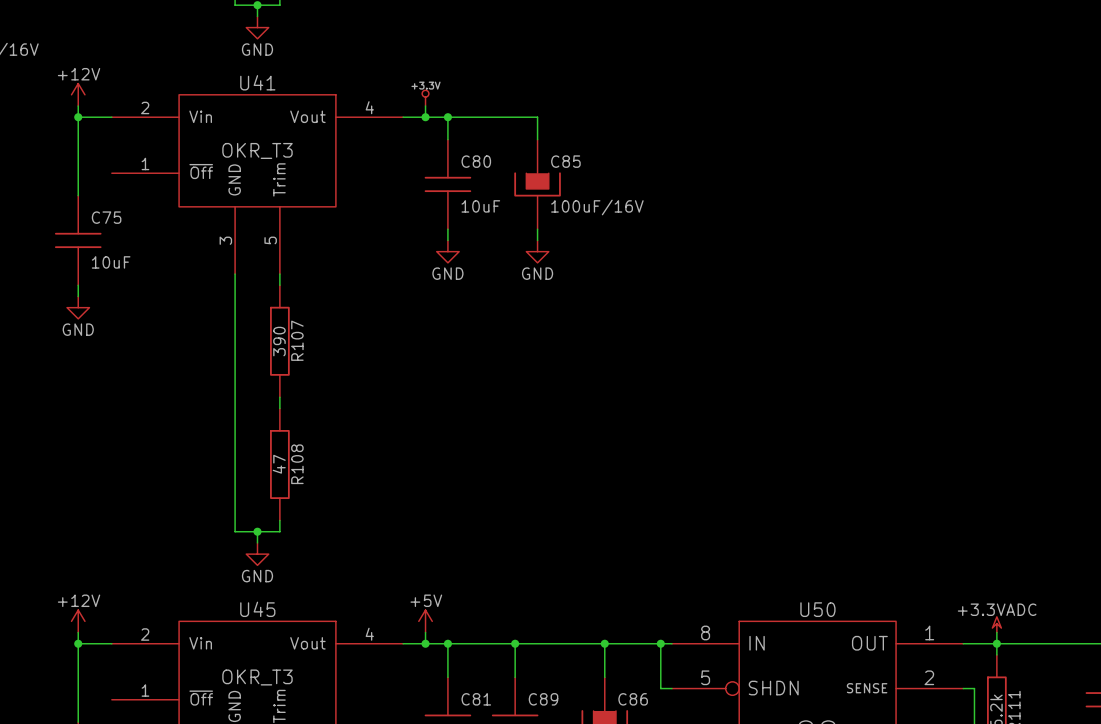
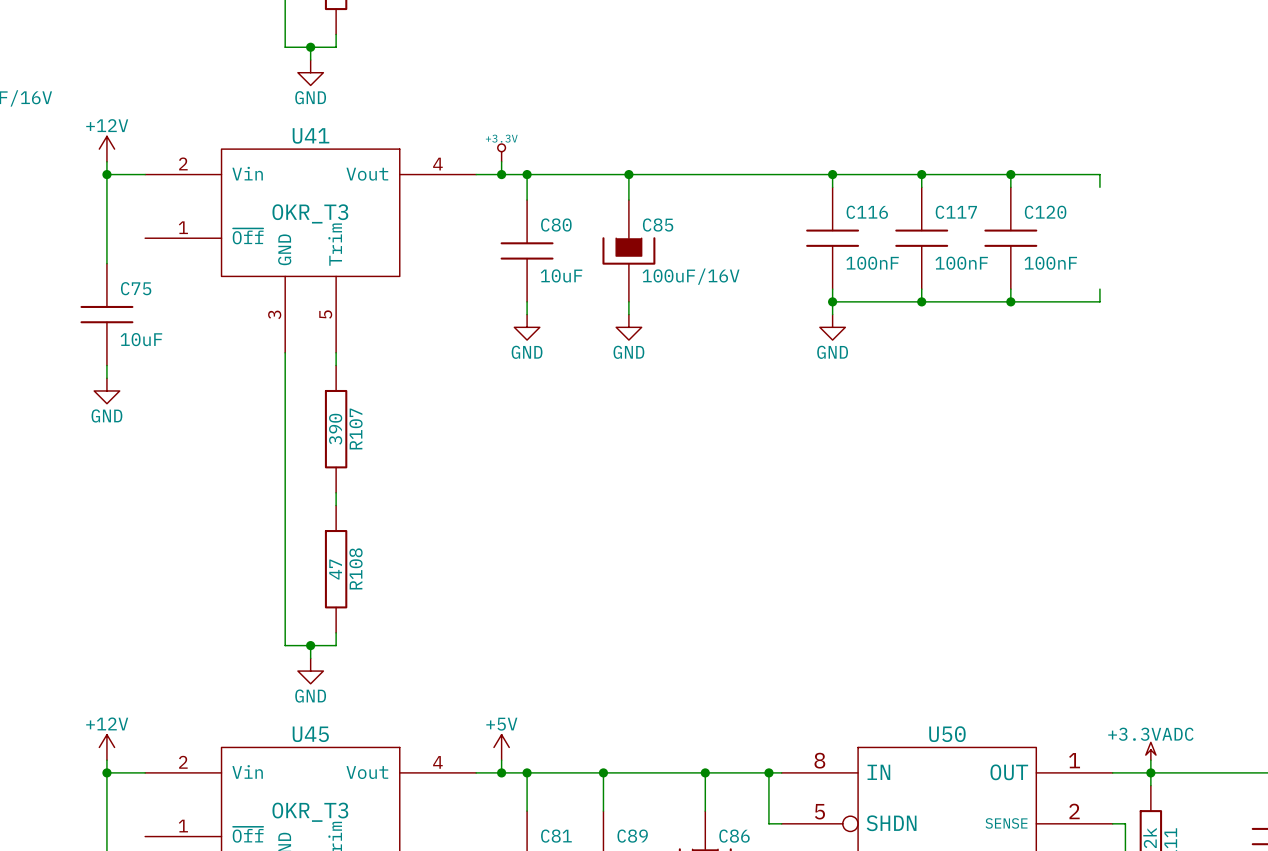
wire: none -> (628, 174) (1099, 174) (1099, 187)
junction: none -> (628, 174)
wire: none -> (832, 174) (832, 187)
junction: none -> (832, 174)
wire: none -> (921, 174) (921, 187)
junction: none -> (921, 174)
wire: none -> (1010, 174) (1010, 187)
junction: none -> (1010, 174)
C116: none -> 100nF (832, 238)
C117: none -> 100nF (921, 238)
C120: none -> 100nF (1010, 238)
wire: none -> (832, 289) (832, 314)
wire: none -> (921, 289) (921, 301)
wire: none -> (1010, 289) (1010, 301)
wire: none -> (1099, 289) (1099, 301) (832, 301)
junction: none -> (832, 301)
junction: none -> (921, 301)
junction: none -> (1010, 301)
power symbol: none -> GND (832, 327)

